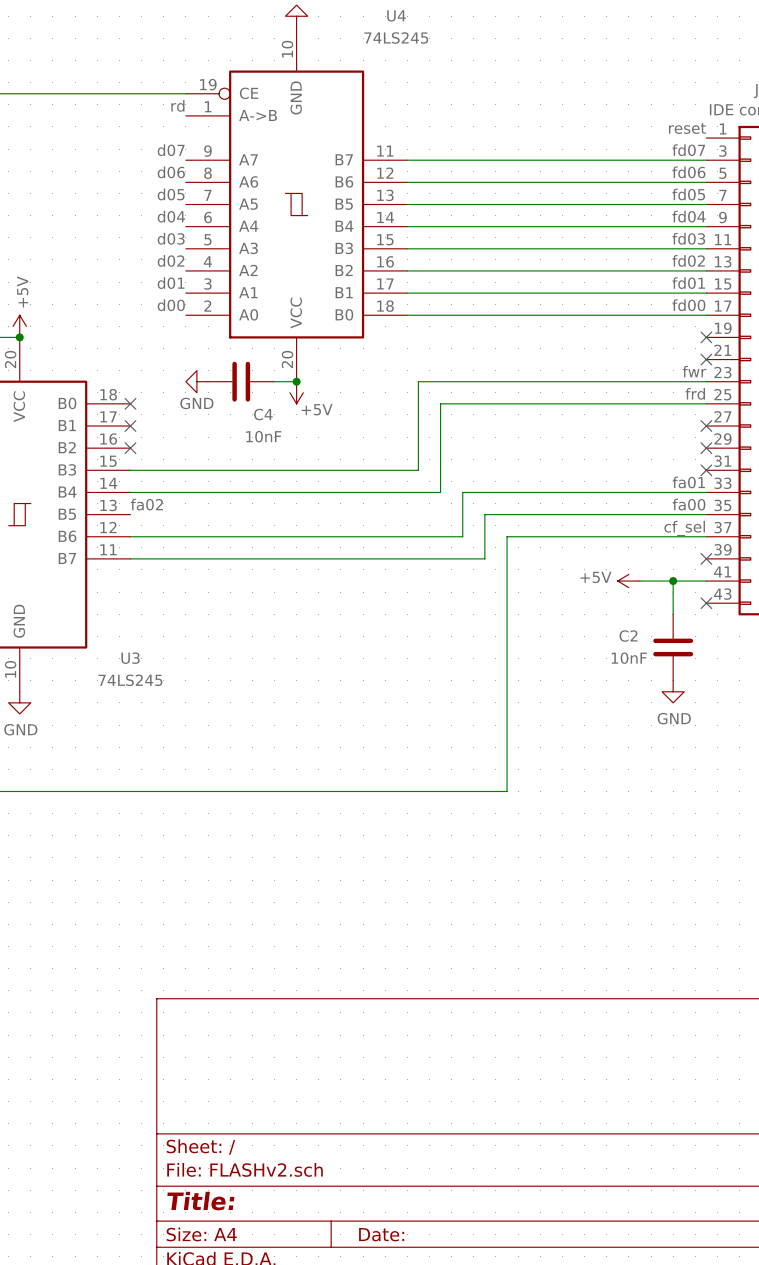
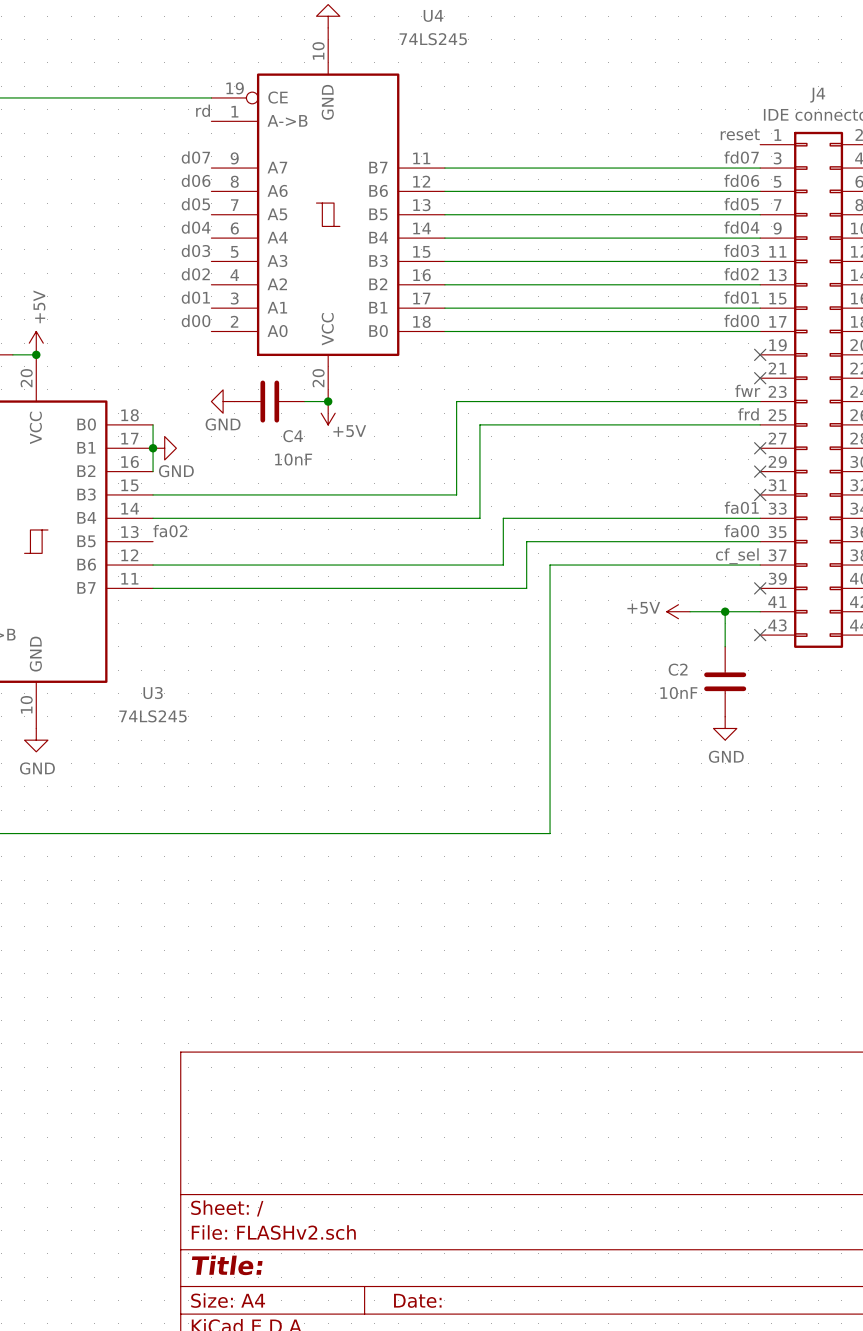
wire: none -> (153, 424) (153, 471)
no-connect mark: (130, 403) -> none
no-connect mark: (130, 426) -> none
junction: none -> (153, 448)
power symbol: none -> GND (164, 448)
no-connect mark: (130, 448) -> none

